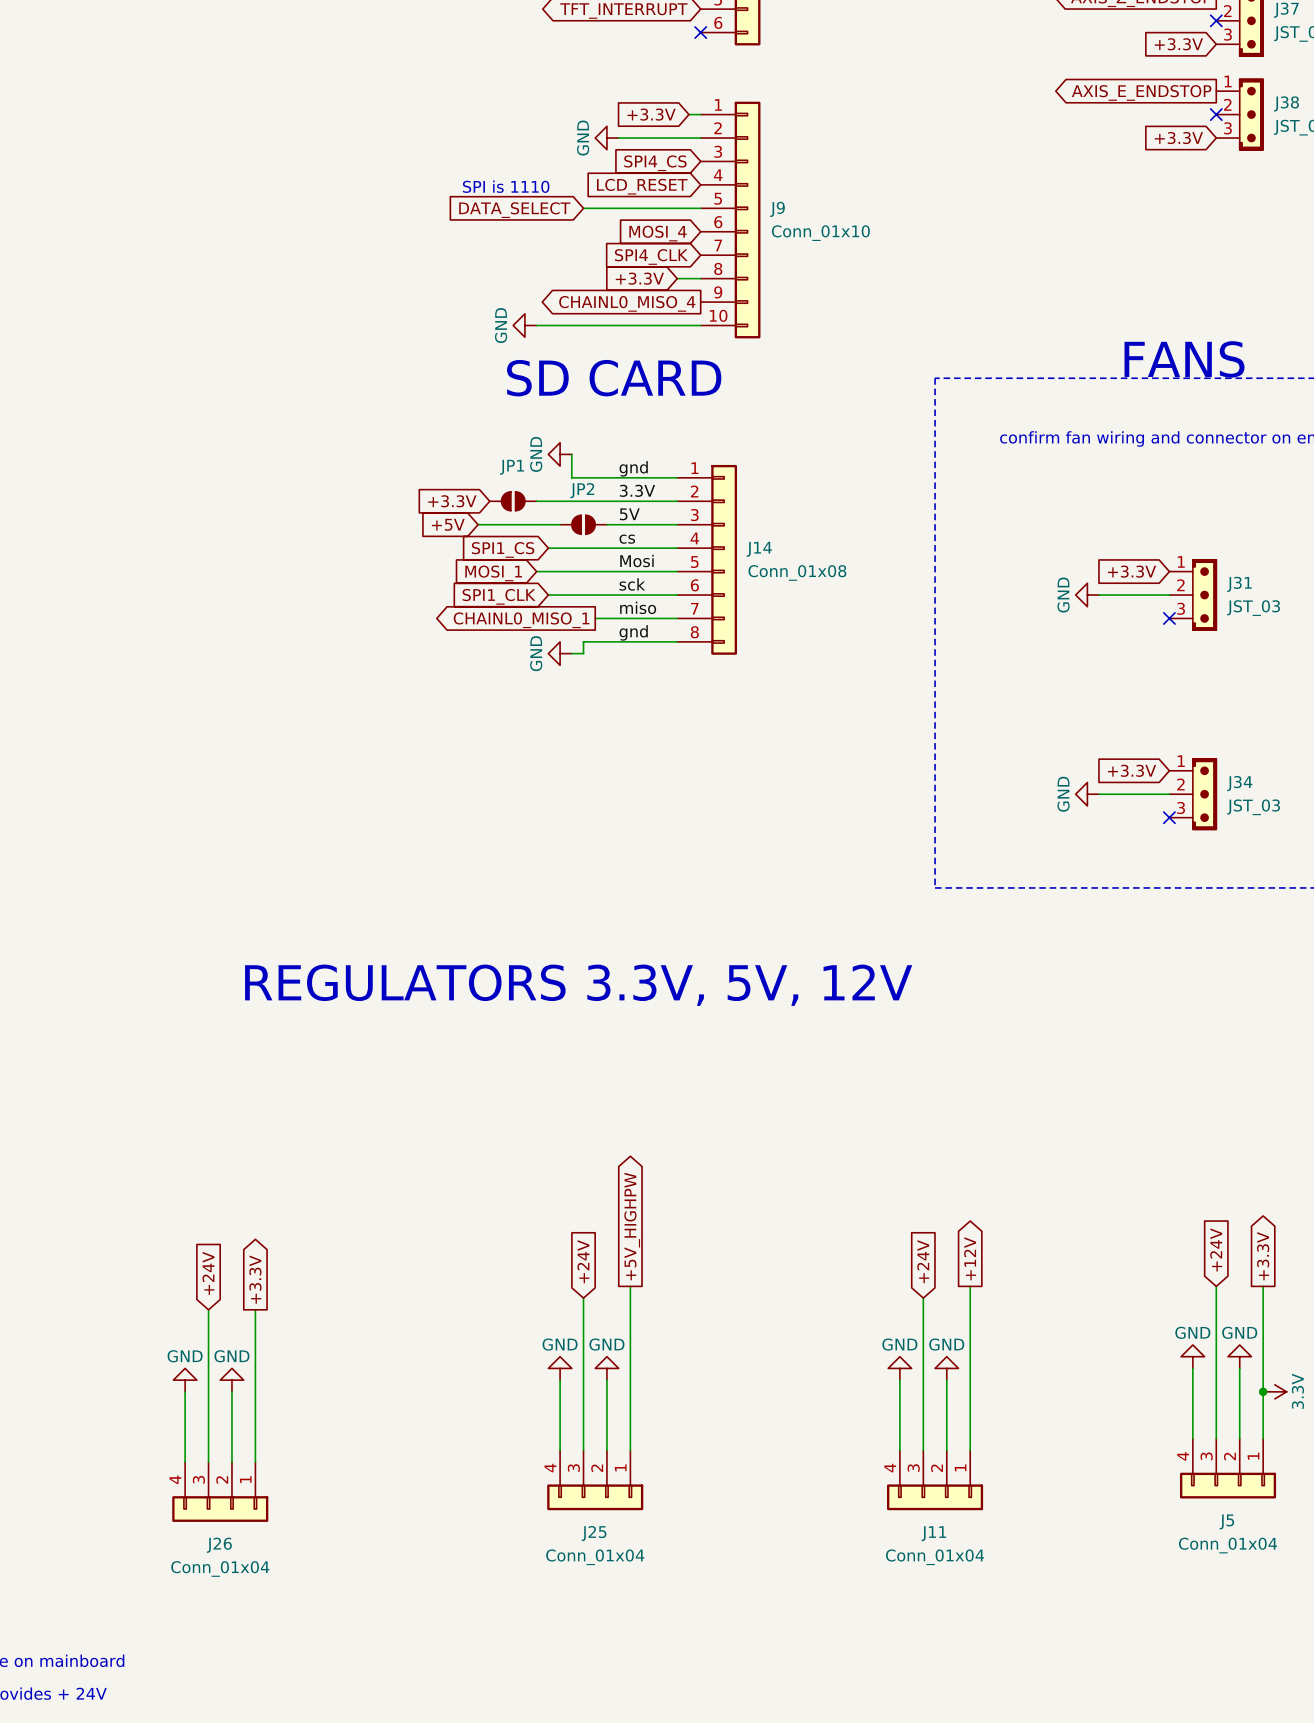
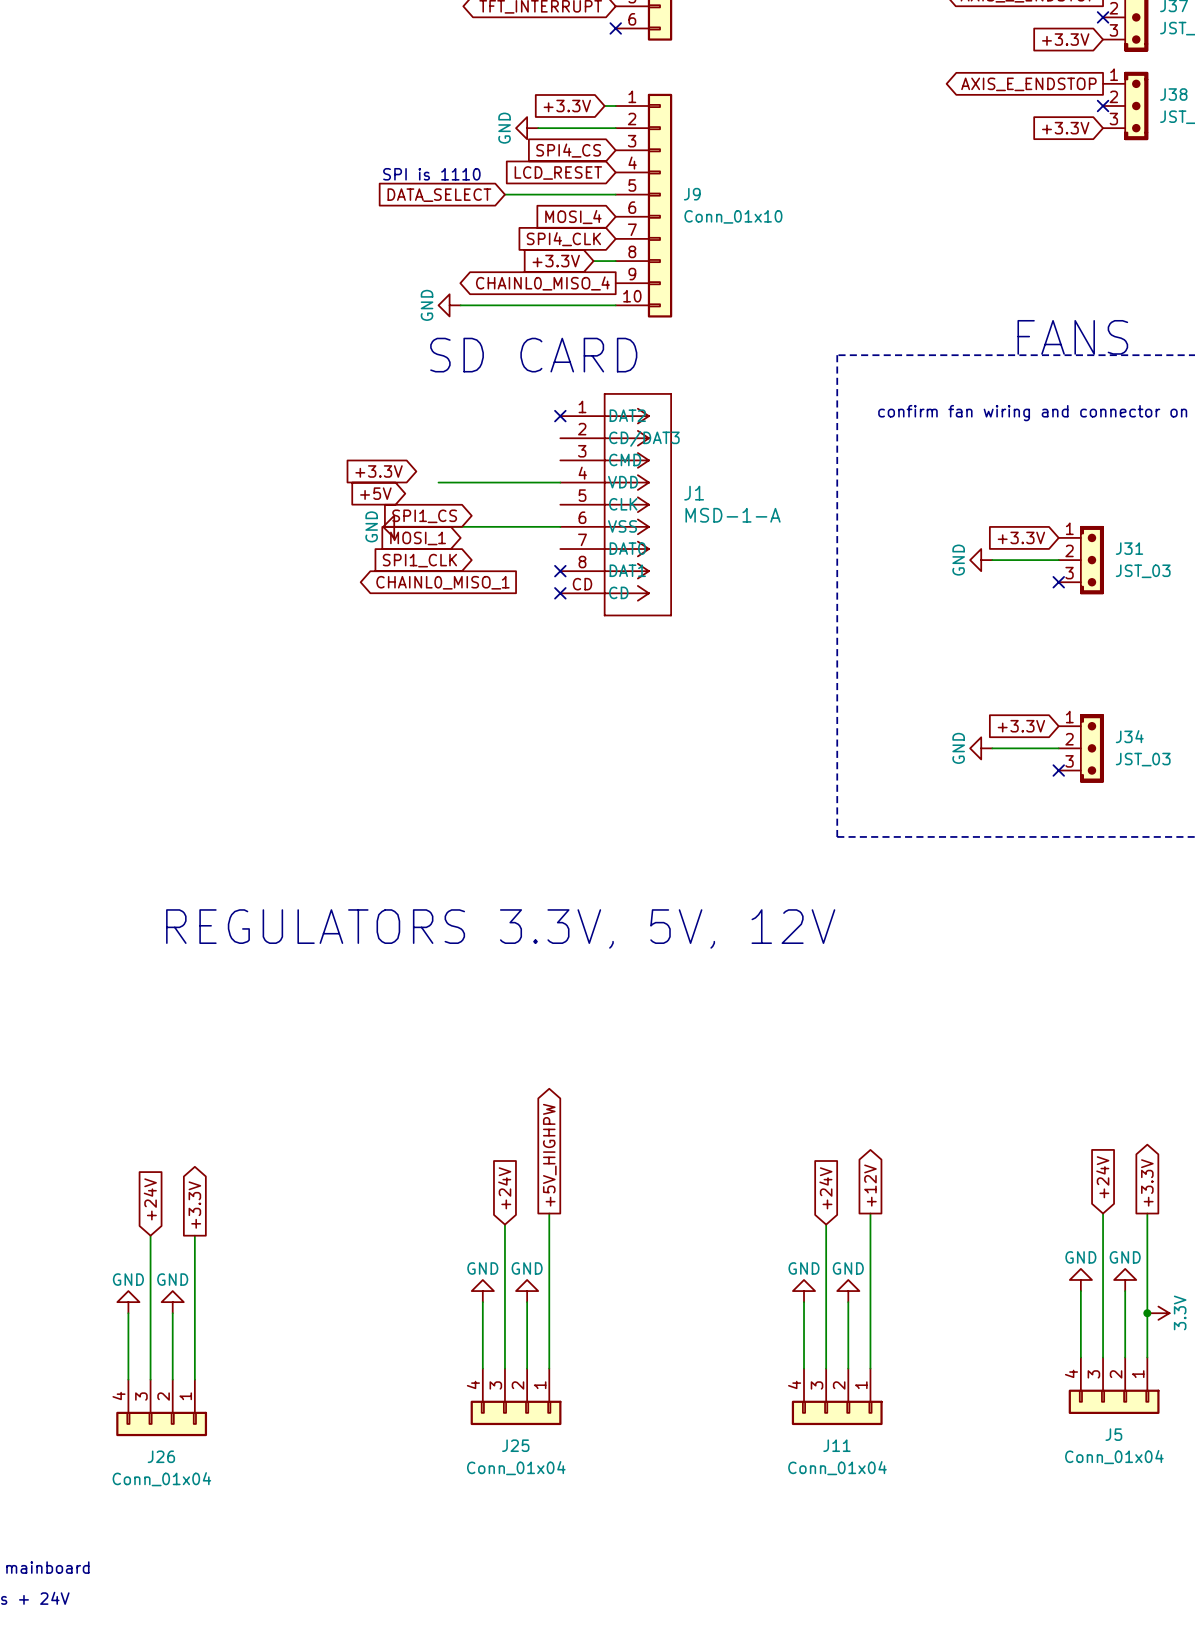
no-connect mark: none -> (560, 416)
power symbol: GND (560, 454) -> none
wire: (571, 454) (571, 477) (677, 477) -> none
label: gnd (633, 468) -> none
label: 3.3V (637, 490) -> none
JP1: (513, 501) -> none
wire: (536, 501) (677, 501) -> none
label: 5V (629, 514) -> none
wire: (478, 524) (560, 524) -> none
JP2: (583, 524) -> none
wire: (606, 524) (677, 524) -> none
J1: none -> MSD-1-A (616, 504)
label: cs (627, 539) -> none
wire: (548, 548) (677, 548) -> (438, 482) (560, 482)
power symbol: none -> GND (394, 526)
wire: none -> (405, 526) (560, 526)
J14: Conn_01x08 (707, 559) -> none
label: Mosi (636, 560) -> none
wire: (536, 571) (677, 571) -> none
label: sck (632, 584) -> none
wire: (548, 595) (677, 595) -> none
no-connect mark: none -> (560, 571)
label: miso (638, 607) -> none
wire: (595, 618) (677, 618) -> none
no-connect mark: none -> (560, 593)
label: gnd (633, 632) -> none
wire: (677, 641) (583, 641) (583, 653) (571, 653) -> none
power symbol: GND (560, 653) -> none

